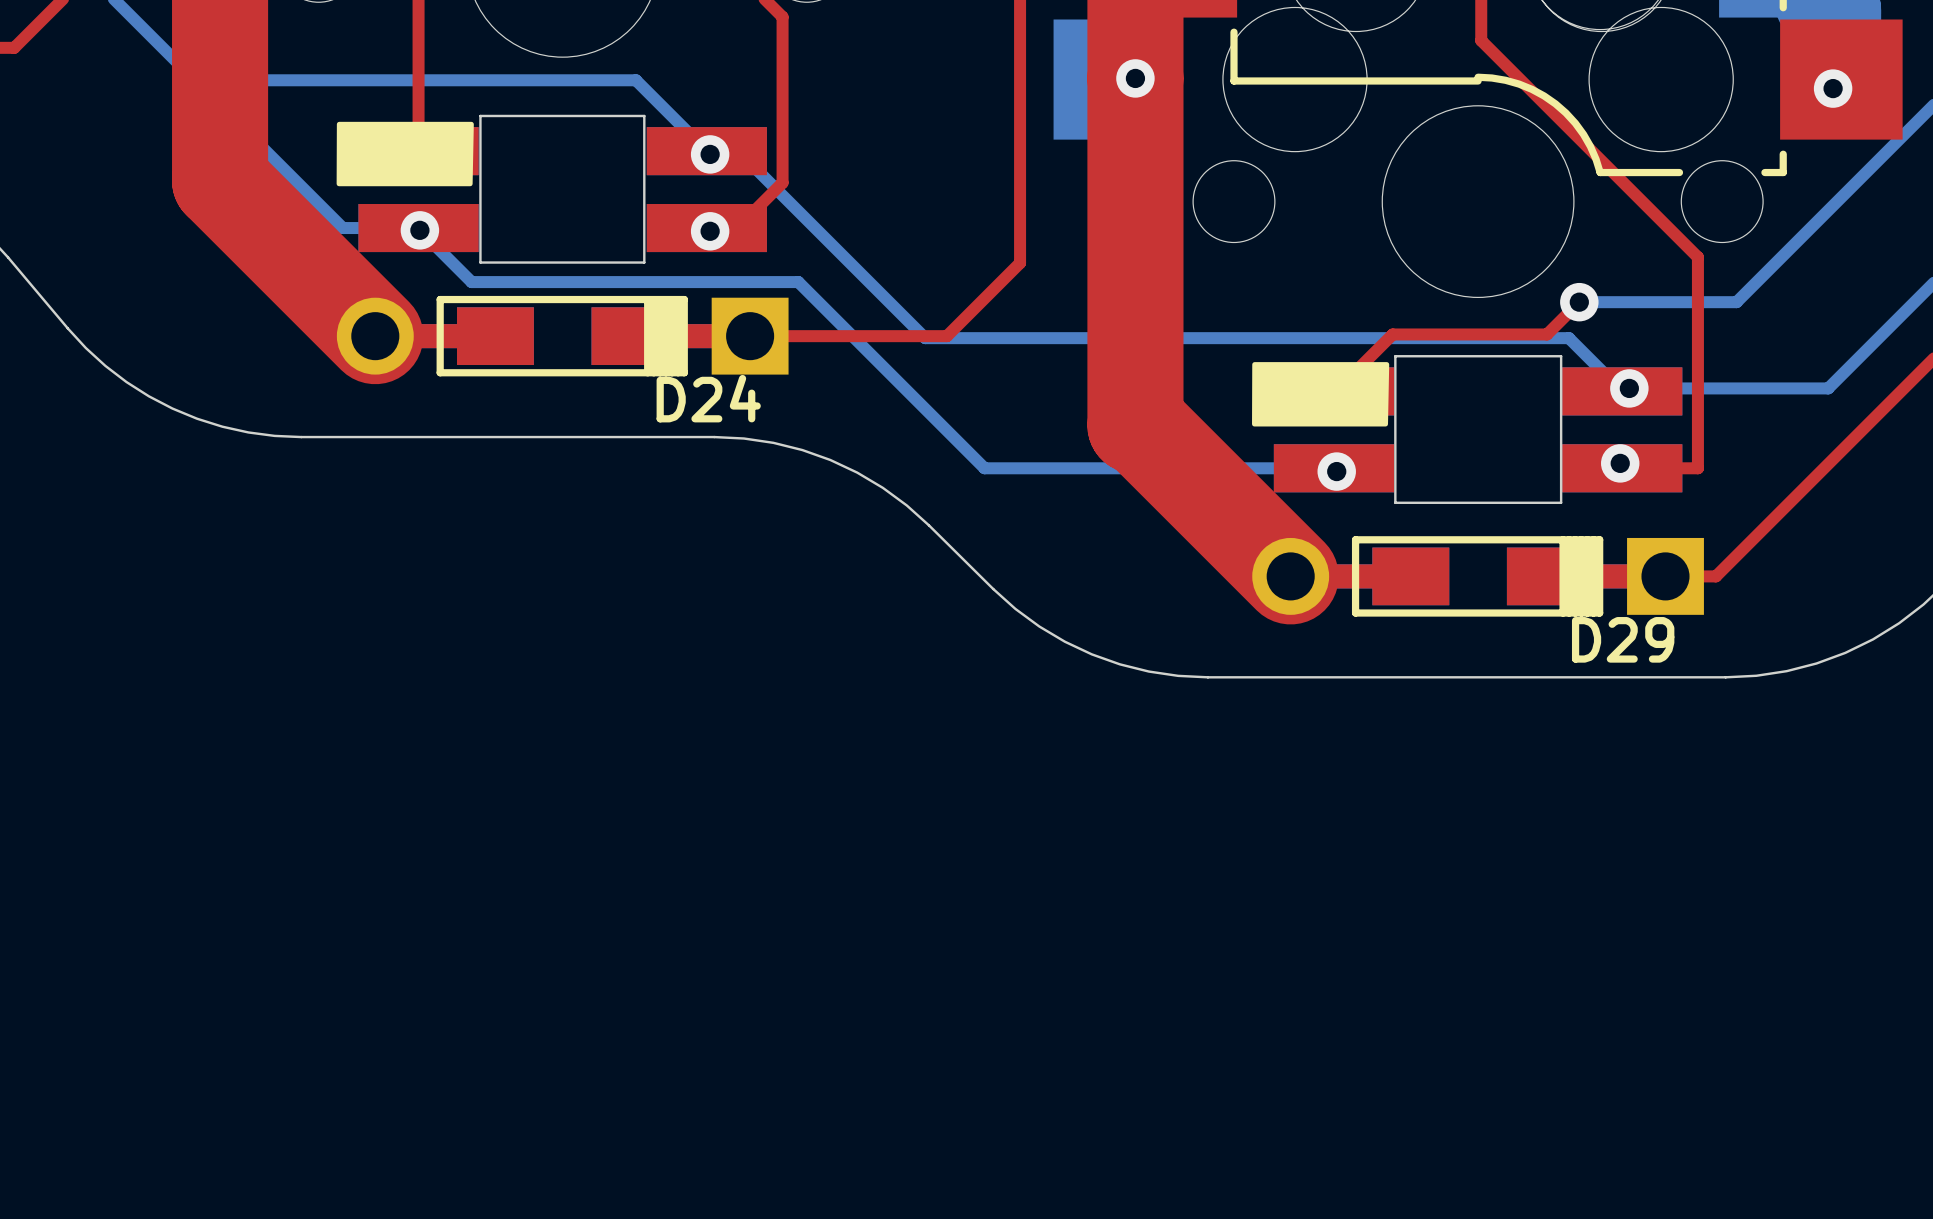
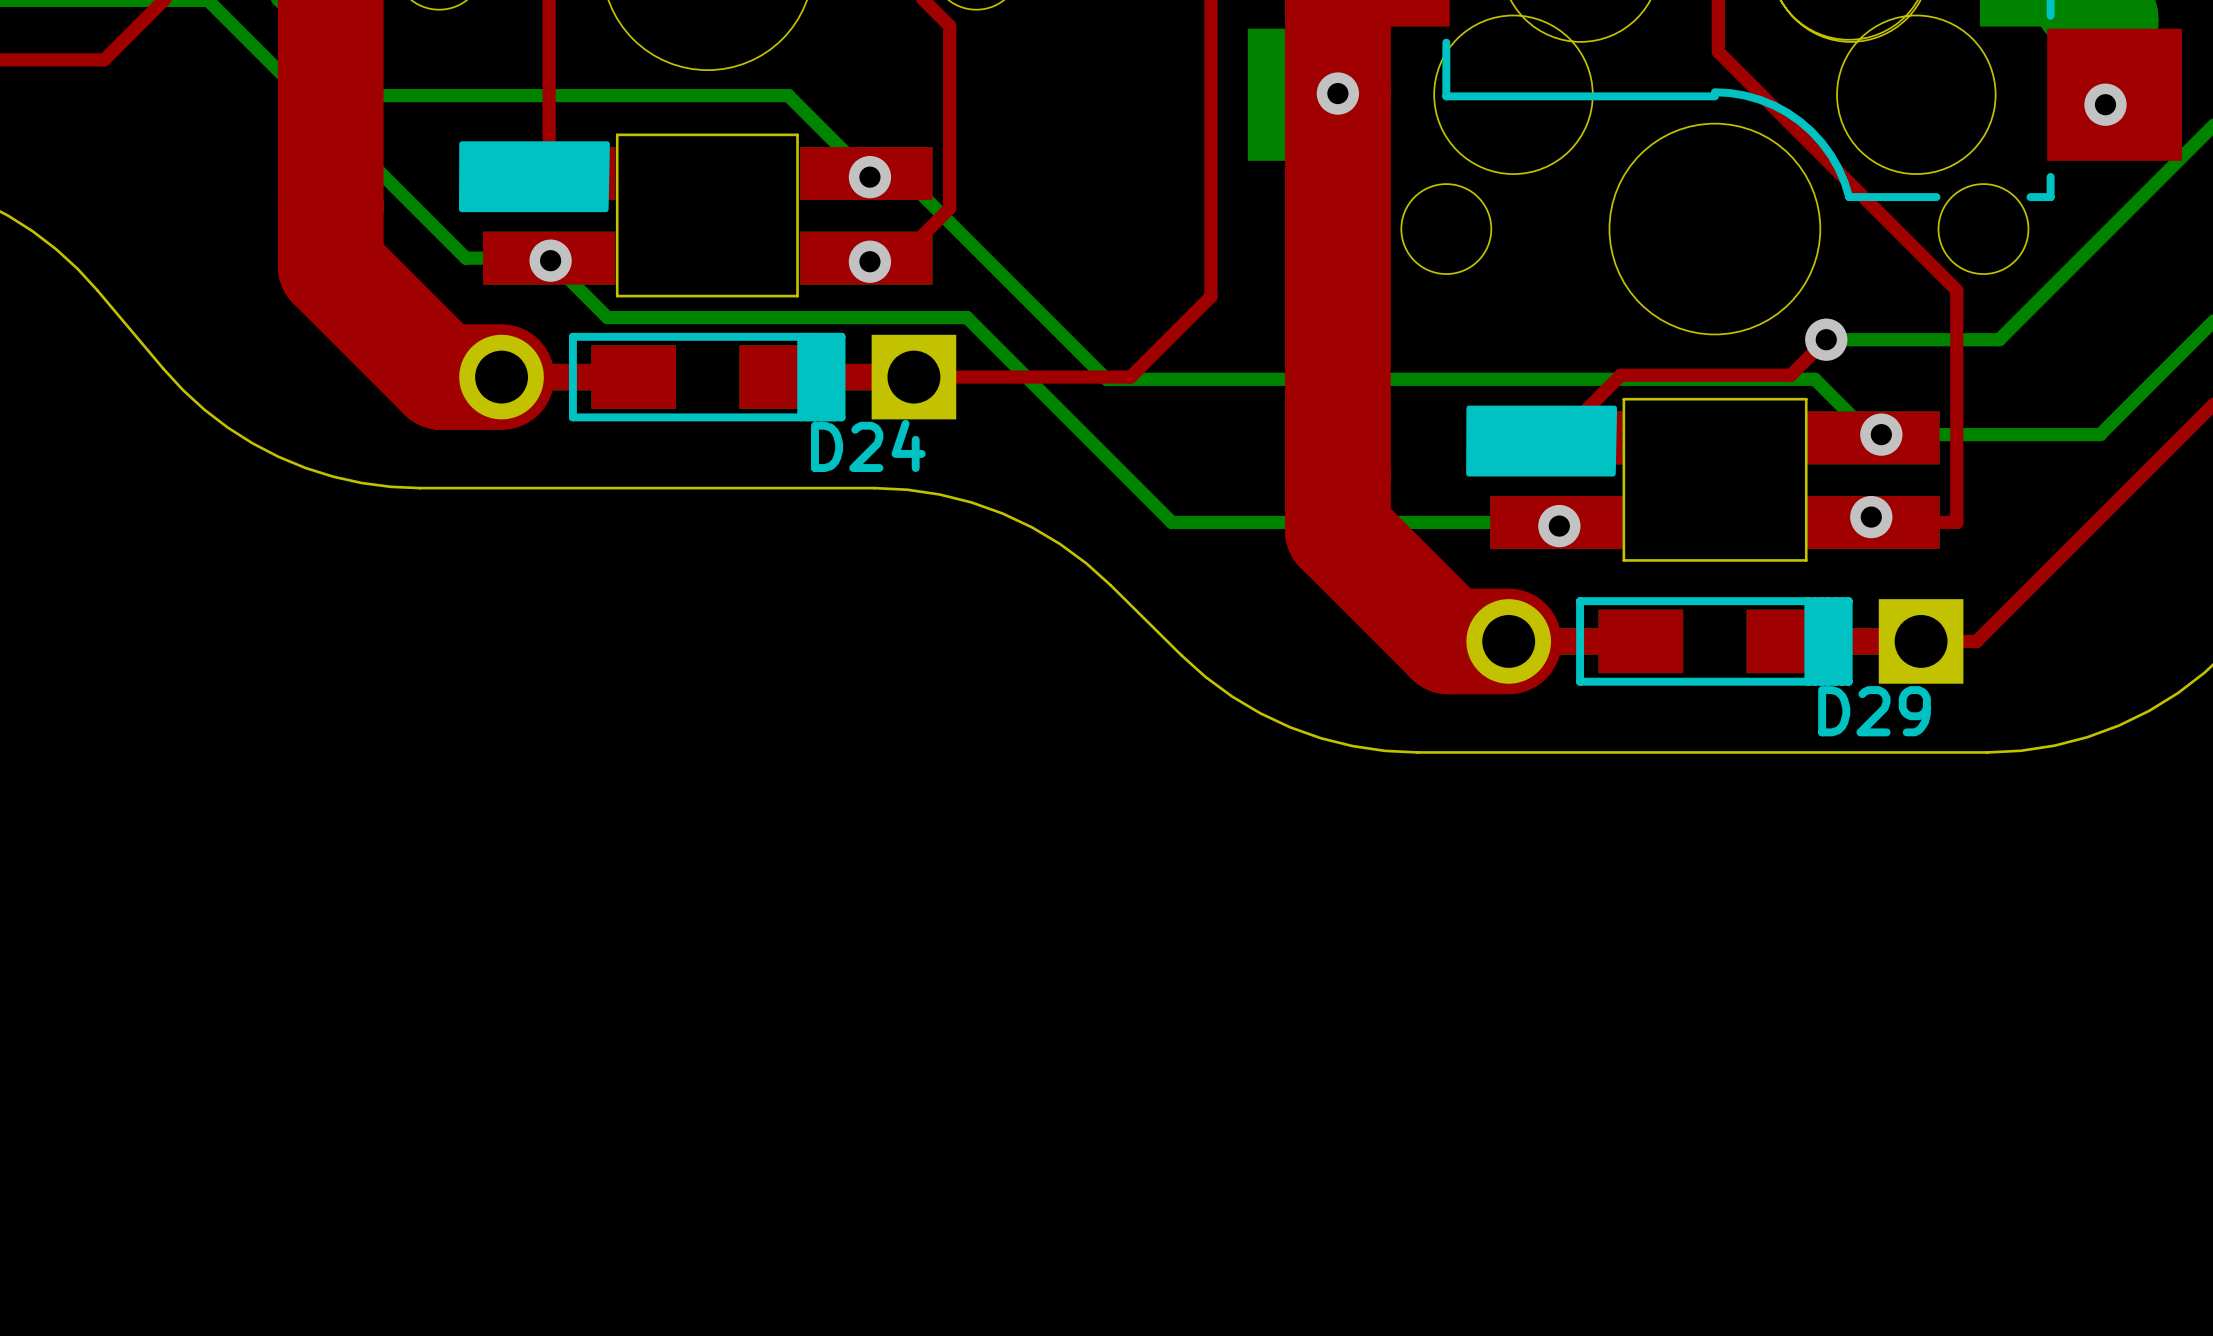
top track: (220, 180) (375, 336) -> (330, 206) (330, 266) (441, 377) (501, 377)
top track: (1135, 425) (1139, 425) (1290, 576) -> (1337, 475) (1337, 530) (1448, 641) (1508, 641)

